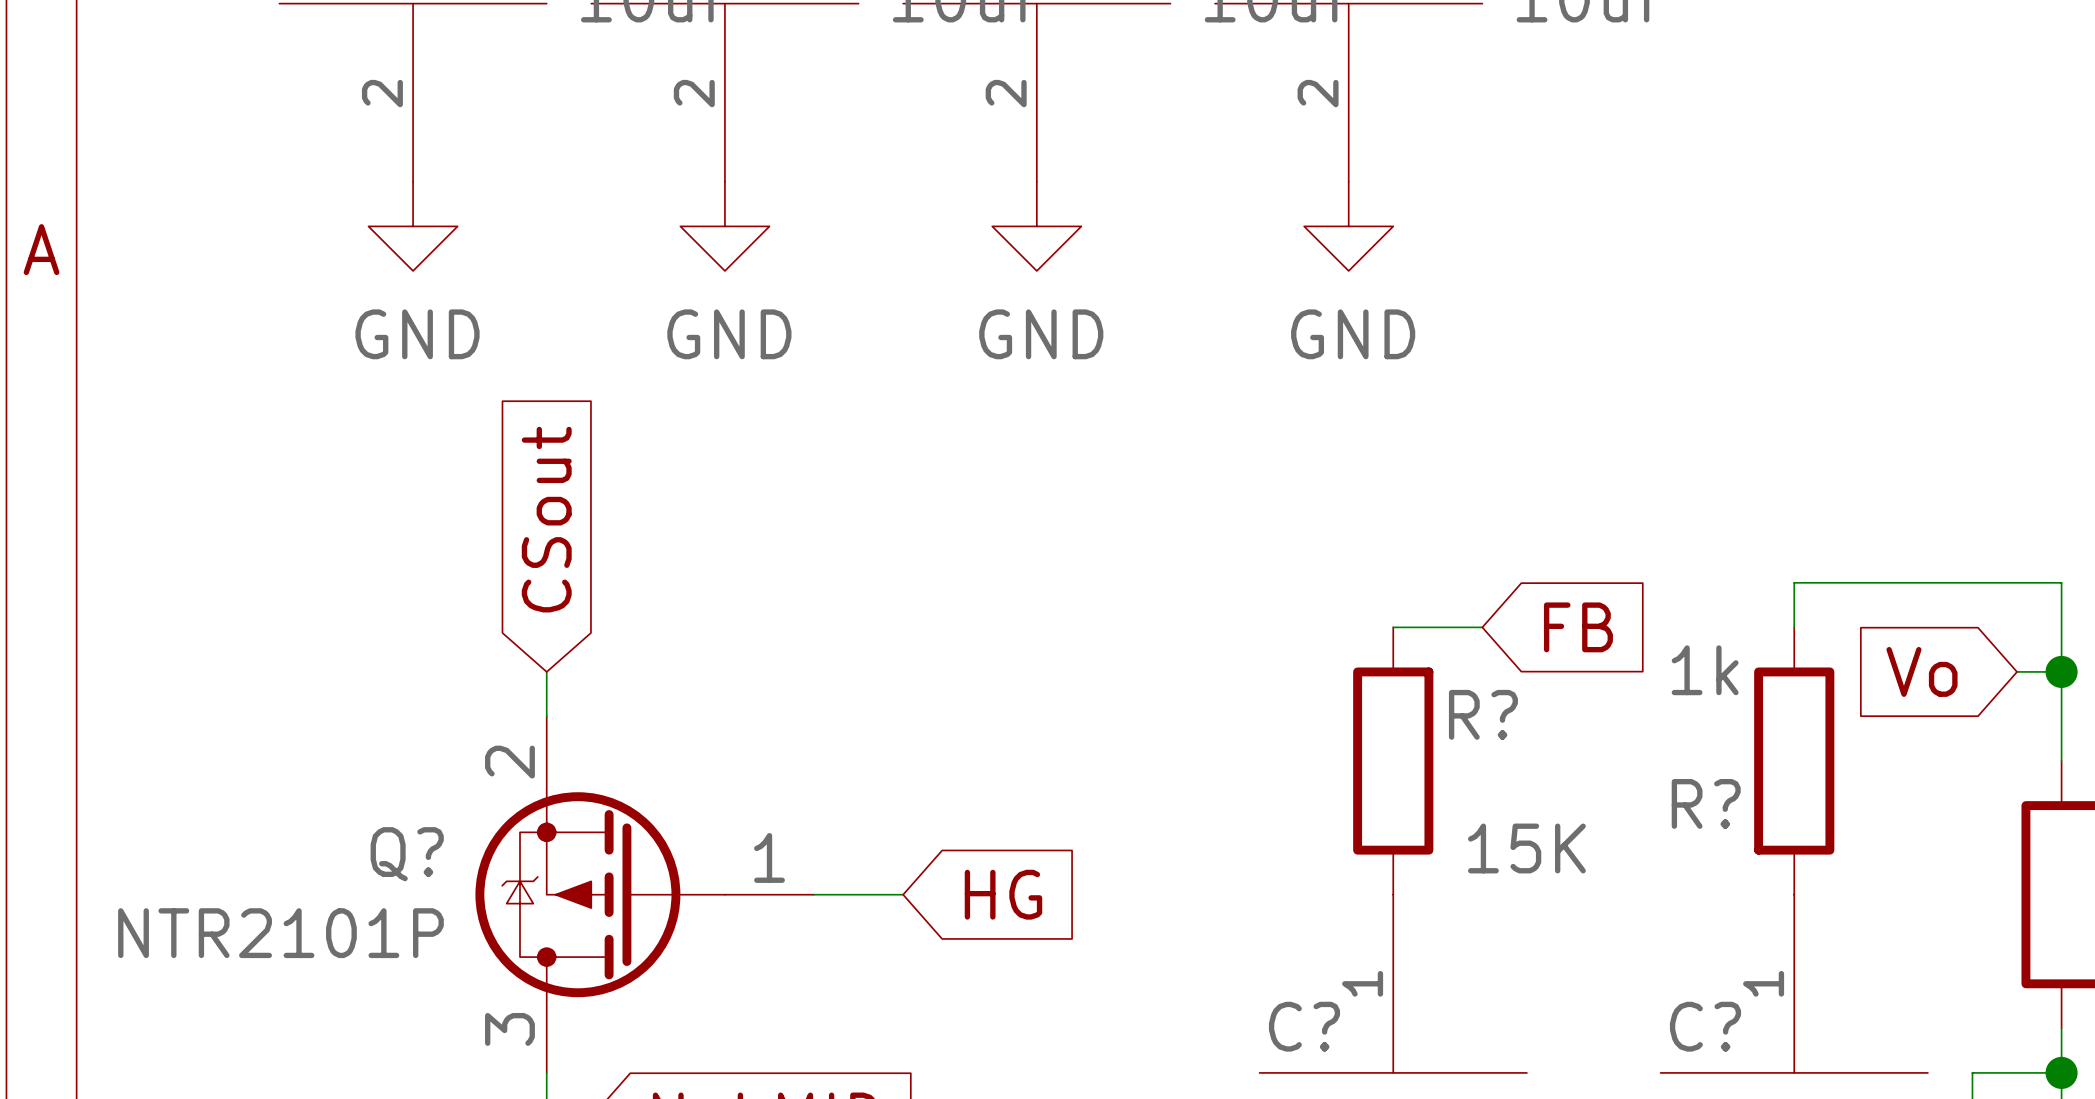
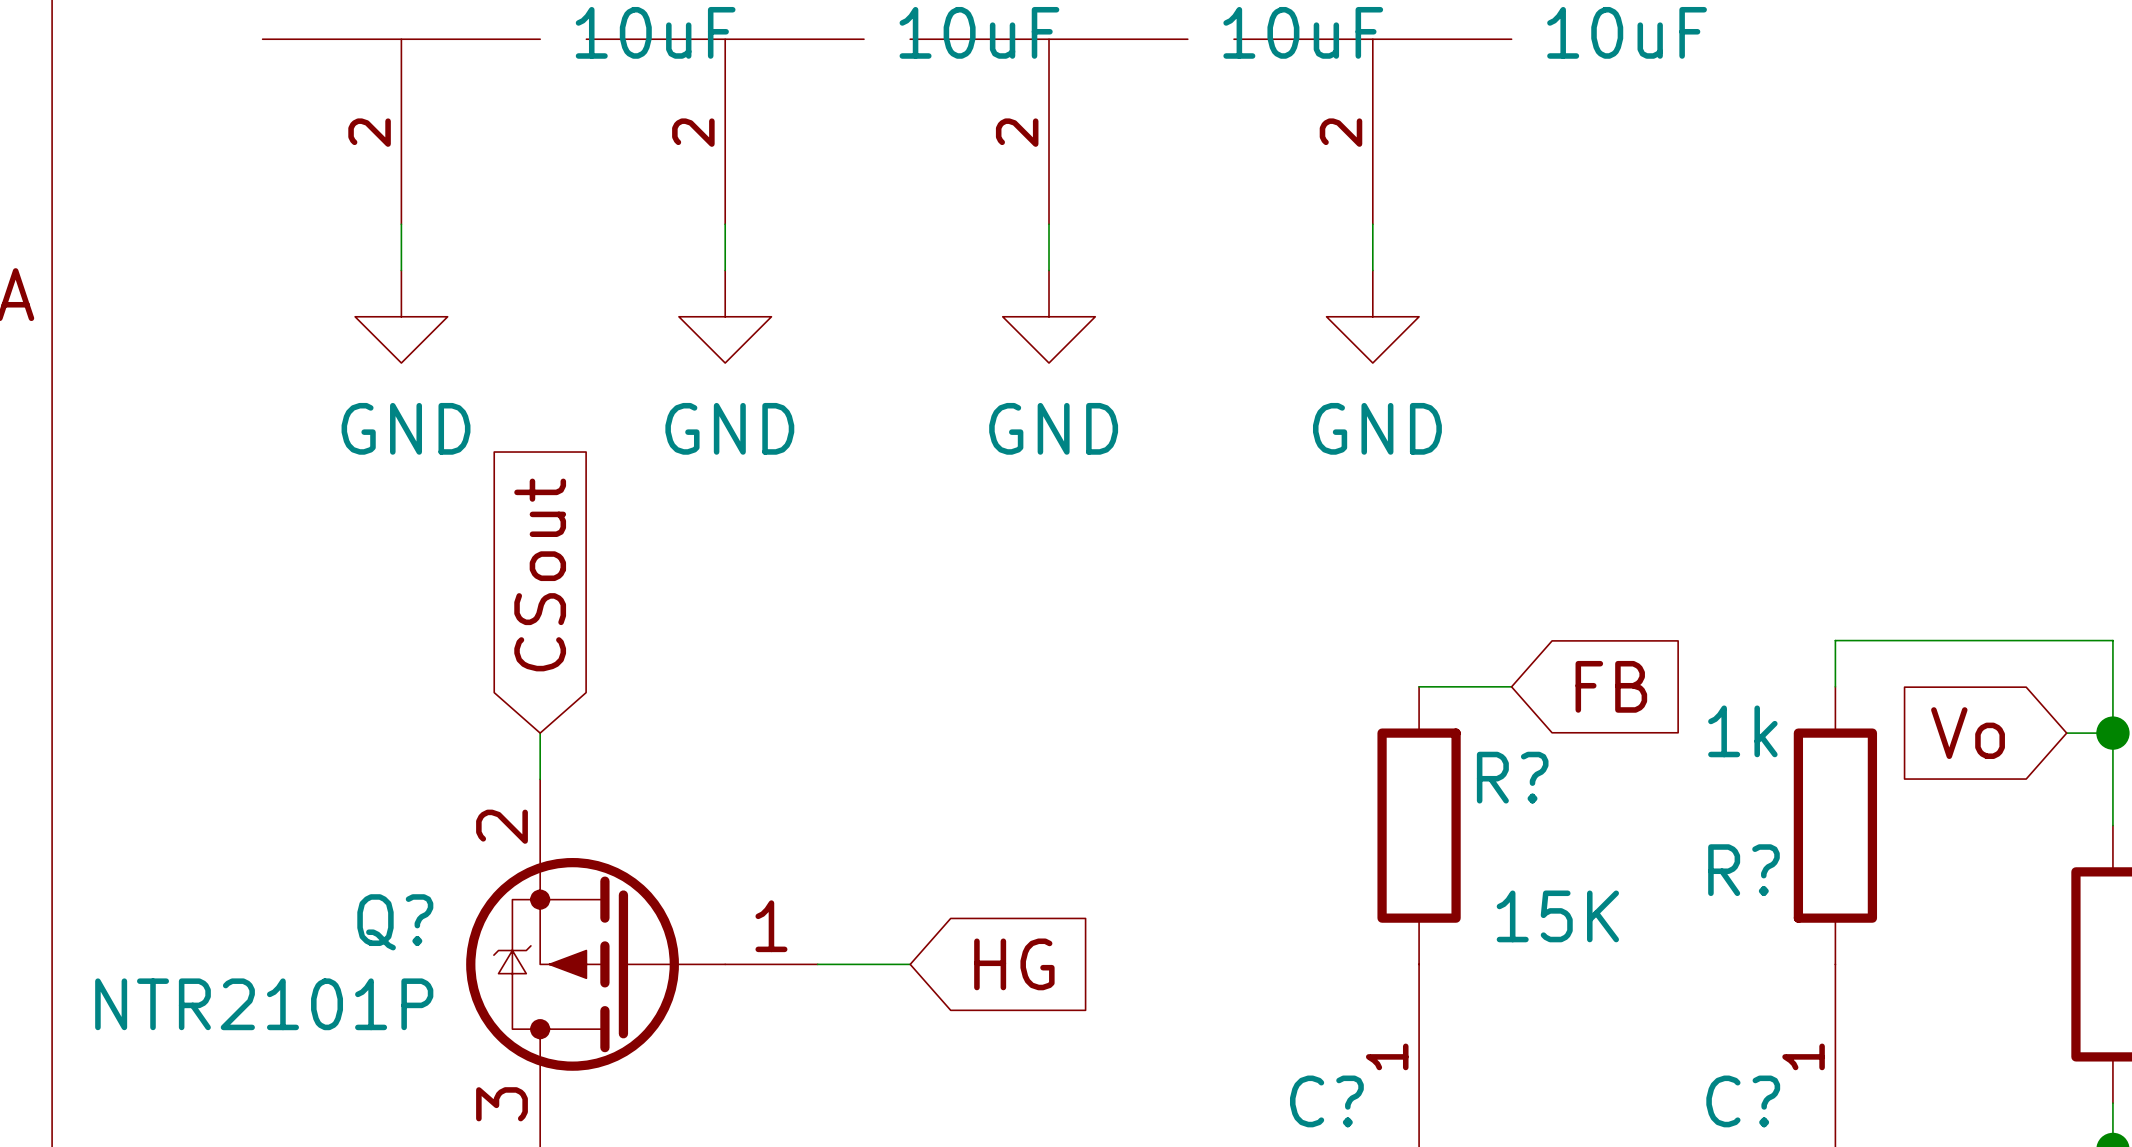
power symbol position: GND (413, 226) -> GND (401, 316)
power symbol position: GND (724, 226) -> GND (725, 316)
power symbol position: GND (1036, 226) -> GND (1049, 316)
power symbol position: GND (1348, 226) -> GND (1372, 316)

